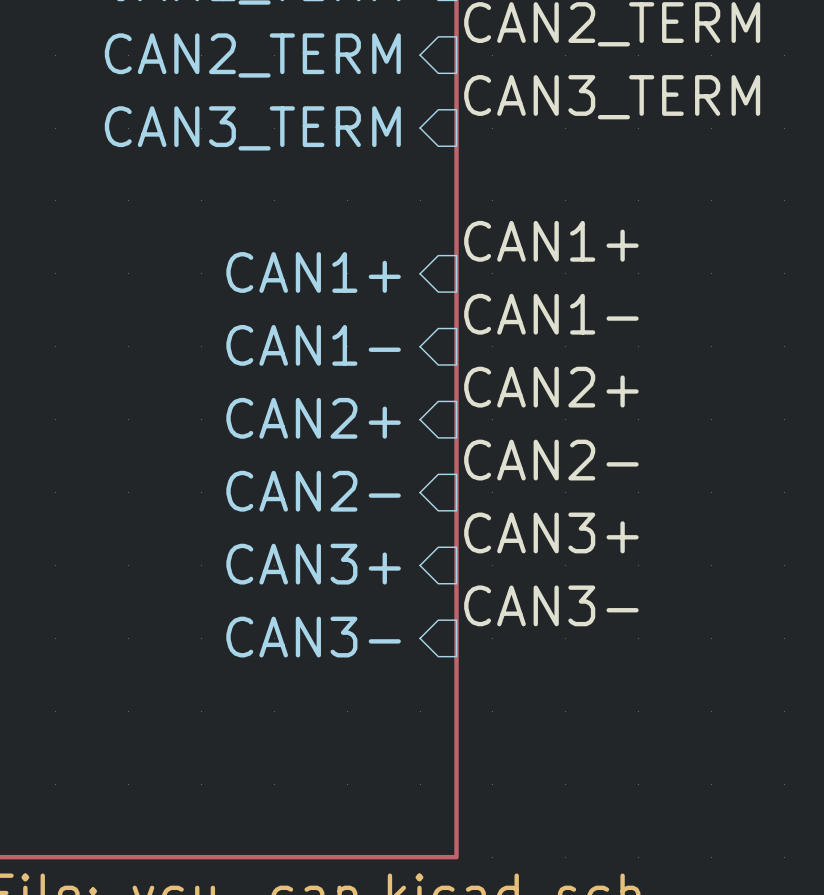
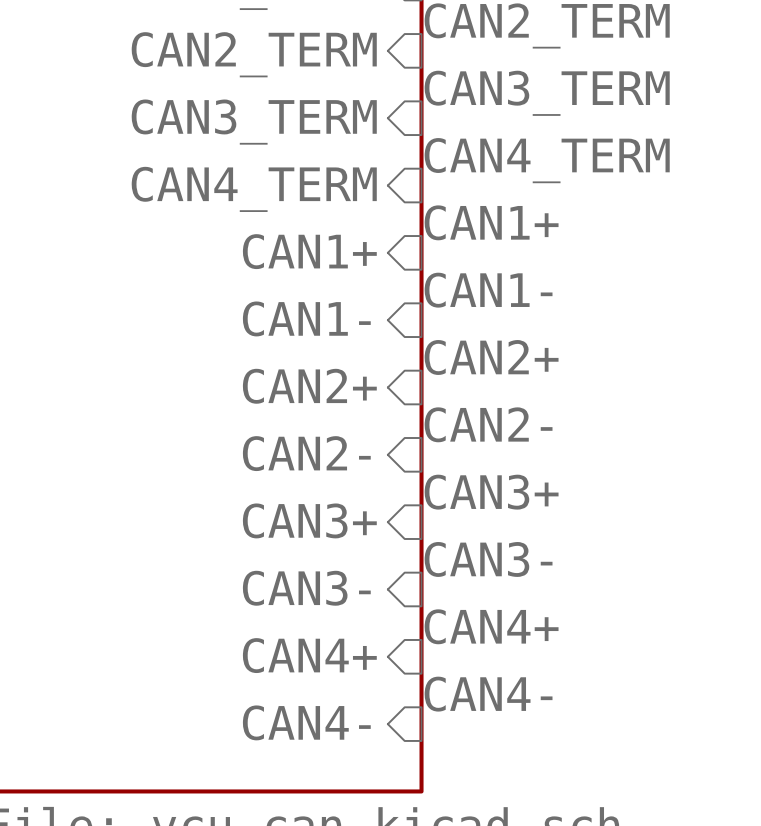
label: none -> CAN4_TERM (547, 160)
sheet pin: none -> CAN4_TERM (254, 189)
label: none -> CAN4+ (491, 626)
sheet pin: none -> CAN4+ (309, 655)
label: none -> CAN4- (488, 694)
sheet pin: none -> CAN4- (306, 722)

